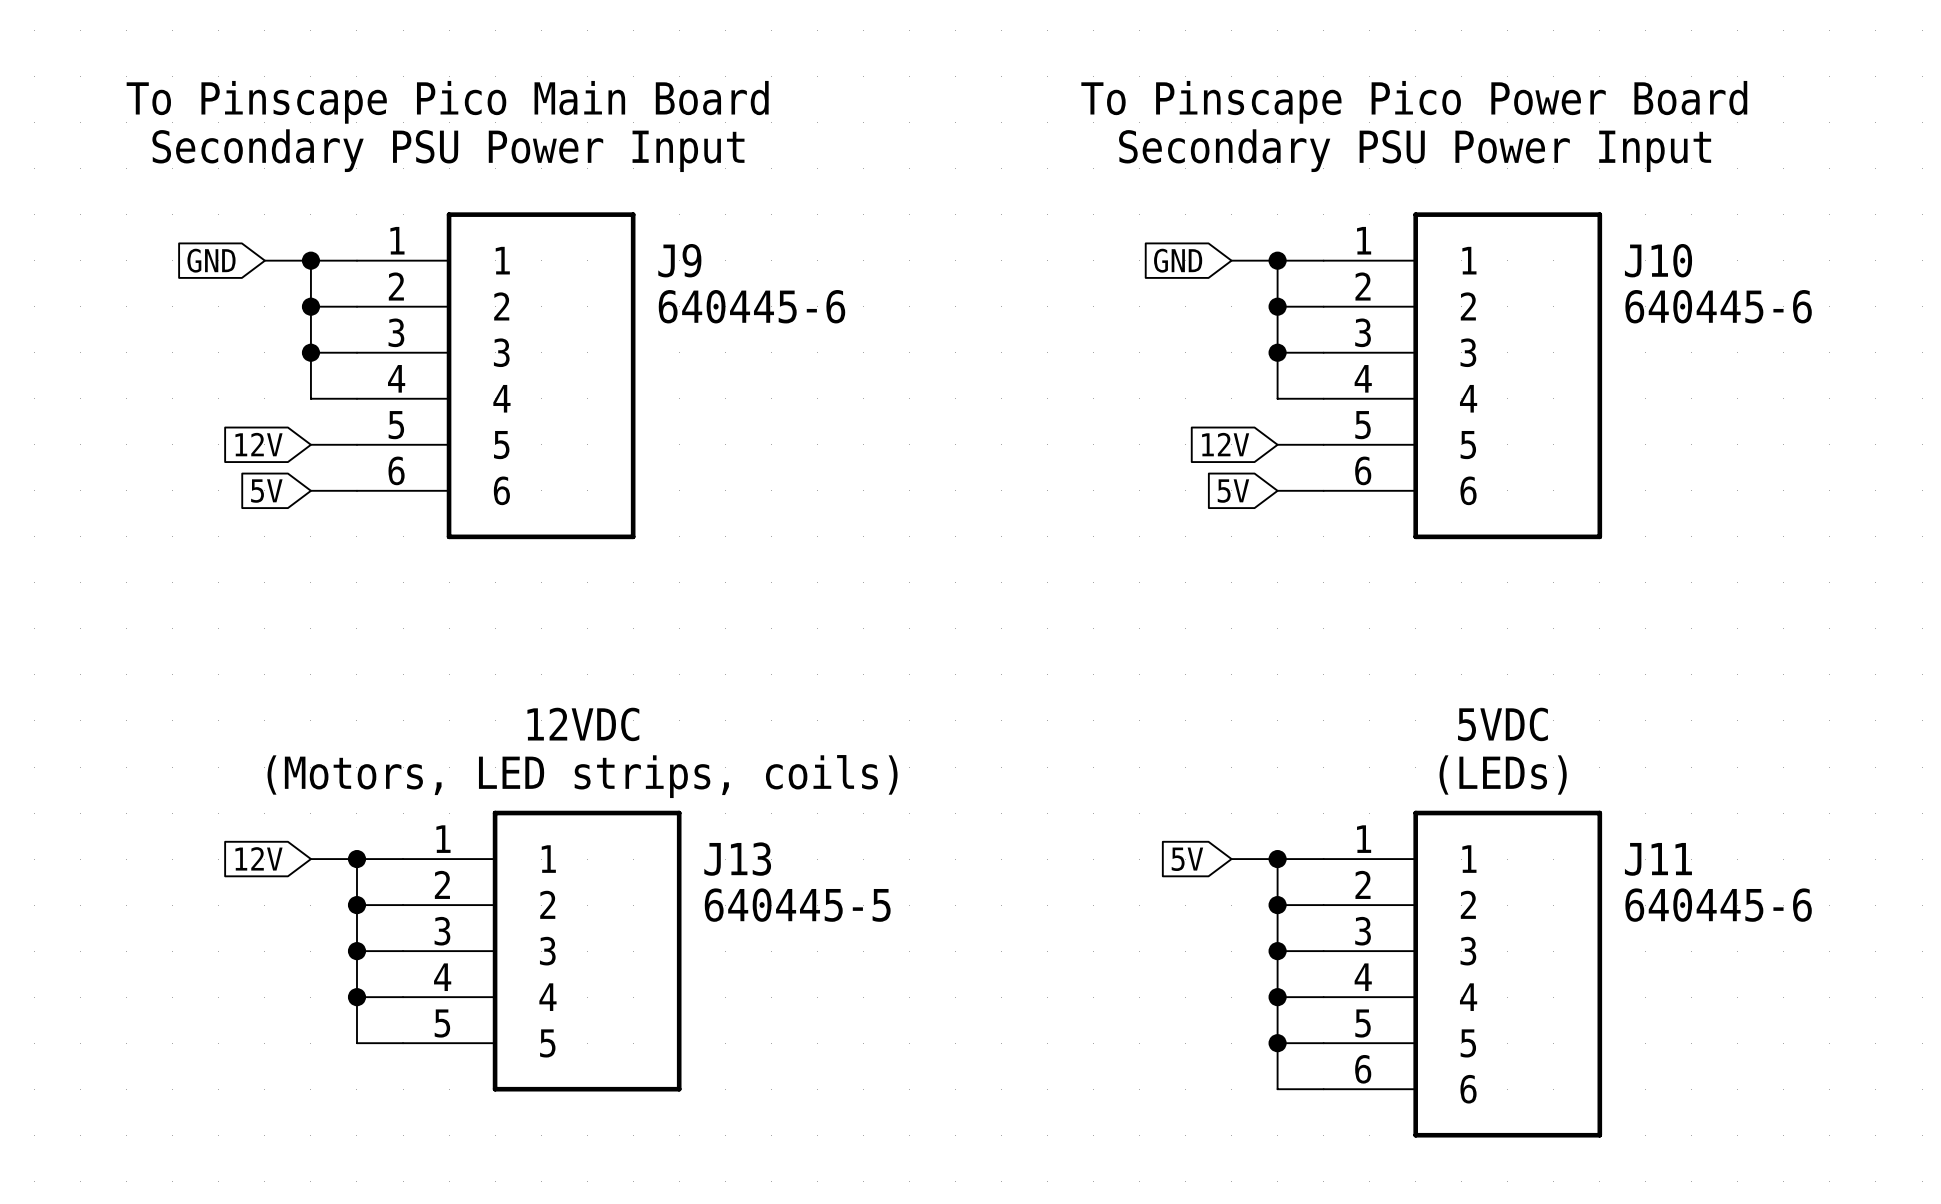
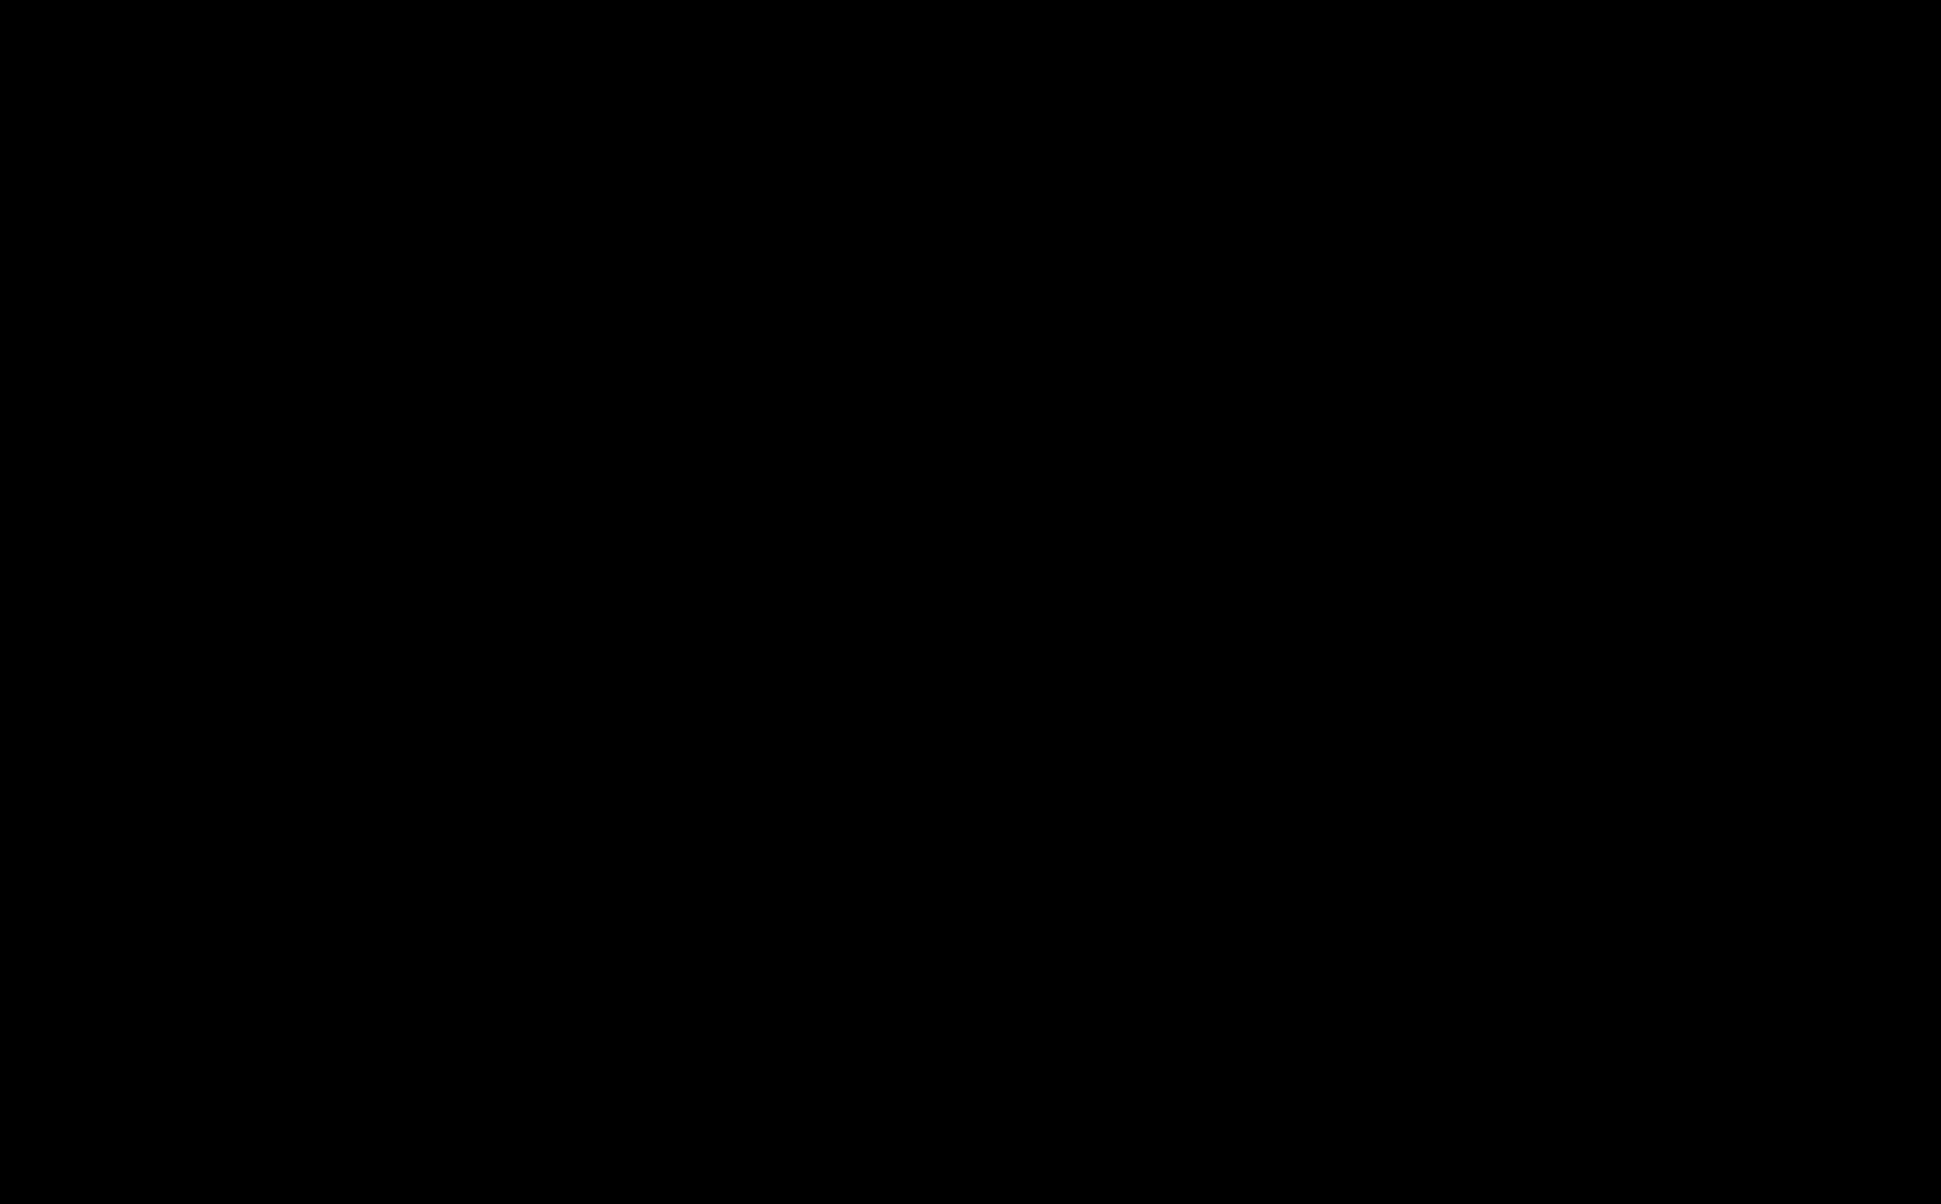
text: To Pinscape Pico Main Board (447, 102) -> none
text: To Pinscape Pico Power Board (1414, 102) -> none
text: Secondary PSU Power Input (448, 150) -> none
text: Secondary PSU Power Input (1415, 150) -> none
global label: GND (211, 260) -> none
wire: (264, 260) (356, 260) -> none
wire: (310, 260) (310, 398) (356, 398) -> none
junction: (310, 260) -> none
global label: GND (1178, 260) -> none
wire: (1231, 260) (1323, 260) -> none
wire: (1277, 260) (1277, 398) (1323, 398) -> none
junction: (1277, 260) -> none
wire: (310, 306) (356, 306) -> none
junction: (310, 306) -> none
wire: (1277, 306) (1323, 306) -> none
junction: (1277, 306) -> none
wire: (310, 352) (356, 352) -> none
junction: (310, 352) -> none
wire: (1277, 352) (1323, 352) -> none
junction: (1277, 352) -> none
J9: 640445-6 (496, 375) -> none
J10: 640445-6 (1462, 375) -> none
global label: 12V (259, 444) -> none
wire: (310, 444) (356, 444) -> none
global label: 12V (1225, 444) -> none
wire: (1277, 444) (1323, 444) -> none
wire: (310, 490) (356, 490) -> none
wire: (1277, 490) (1323, 490) -> none
global label: 5V (266, 491) -> none
global label: 5V (1233, 491) -> none
text: 12VDC (583, 724) -> none
text: 5VDC (1502, 724) -> none
text: (LEDs) (1503, 775) -> none
text: (Motors, LED strips, coils) (582, 776) -> none
global label: 12V (259, 858) -> none
wire: (310, 859) (403, 859) -> none
wire: (356, 859) (356, 1043) (403, 1043) -> none
junction: (356, 859) -> none
global label: 5V (1187, 859) -> none
wire: (1231, 859) (1323, 859) -> none
wire: (1277, 859) (1277, 1089) (1323, 1089) -> none
junction: (1277, 859) -> none
wire: (356, 905) (403, 905) -> none
junction: (356, 905) -> none
wire: (1277, 905) (1323, 905) -> none
junction: (1277, 905) -> none
wire: (356, 951) (403, 951) -> none
junction: (356, 951) -> none
J13: 640445-5 (542, 951) -> none
wire: (1277, 951) (1323, 951) -> none
junction: (1277, 951) -> none
J11: 640445-6 (1462, 974) -> none
wire: (356, 997) (403, 997) -> none
junction: (356, 997) -> none
wire: (1277, 997) (1323, 997) -> none
junction: (1277, 997) -> none
wire: (1277, 1043) (1323, 1043) -> none
junction: (1277, 1043) -> none

